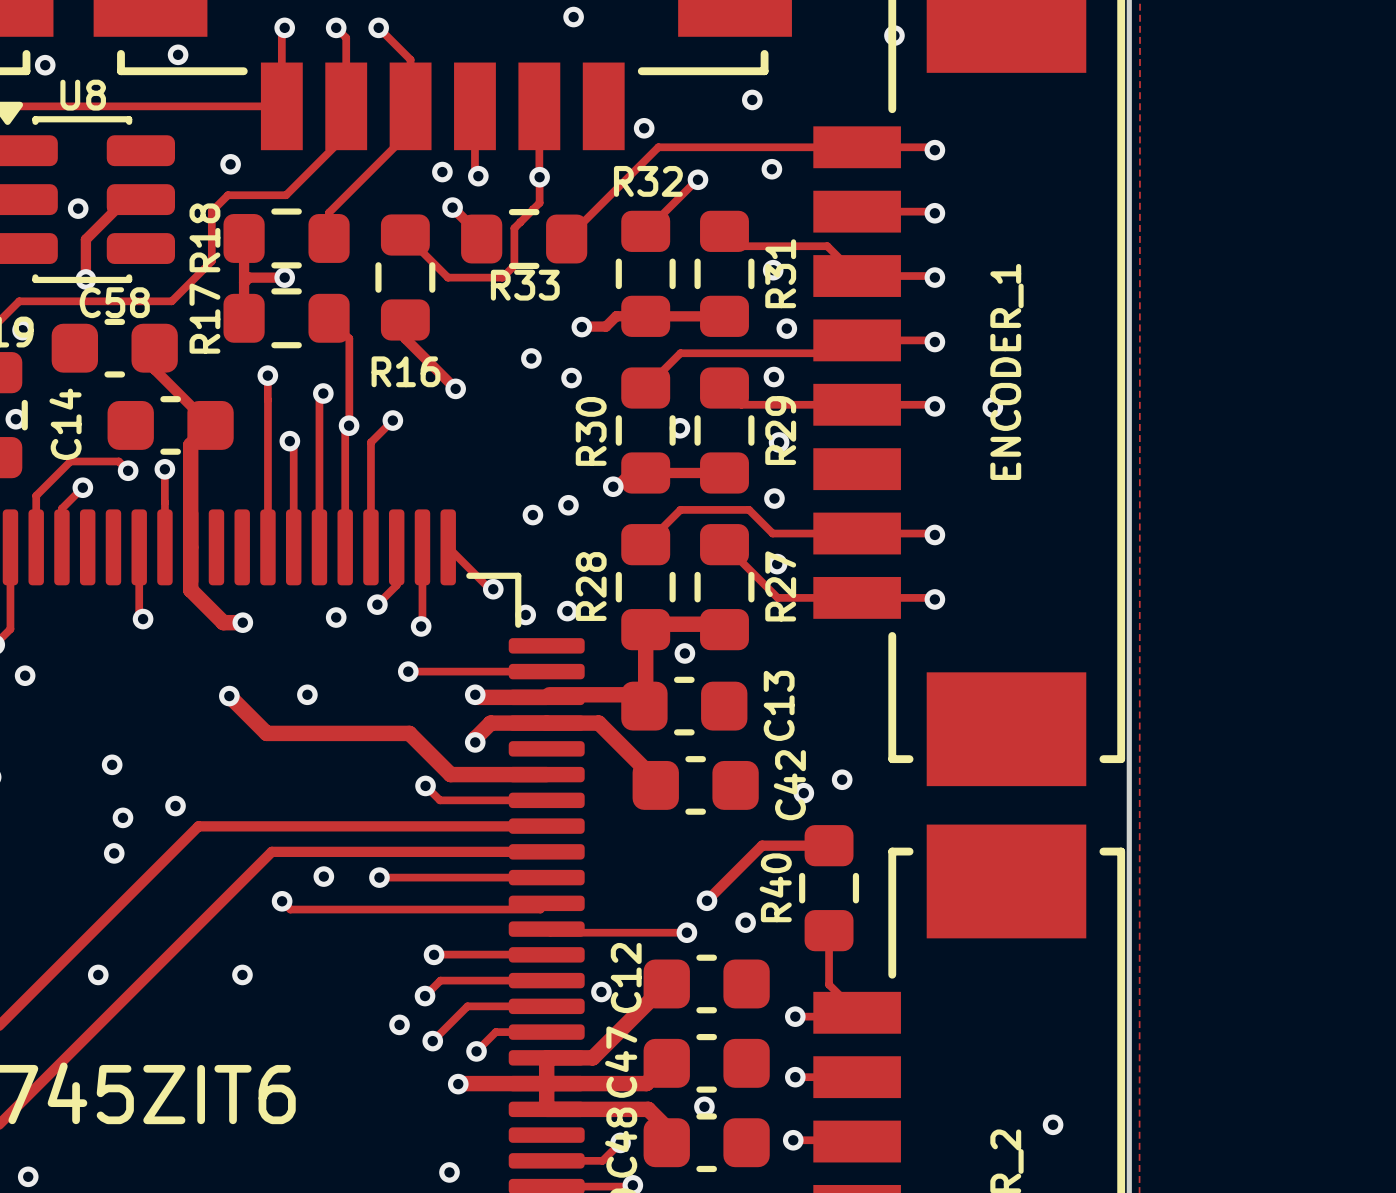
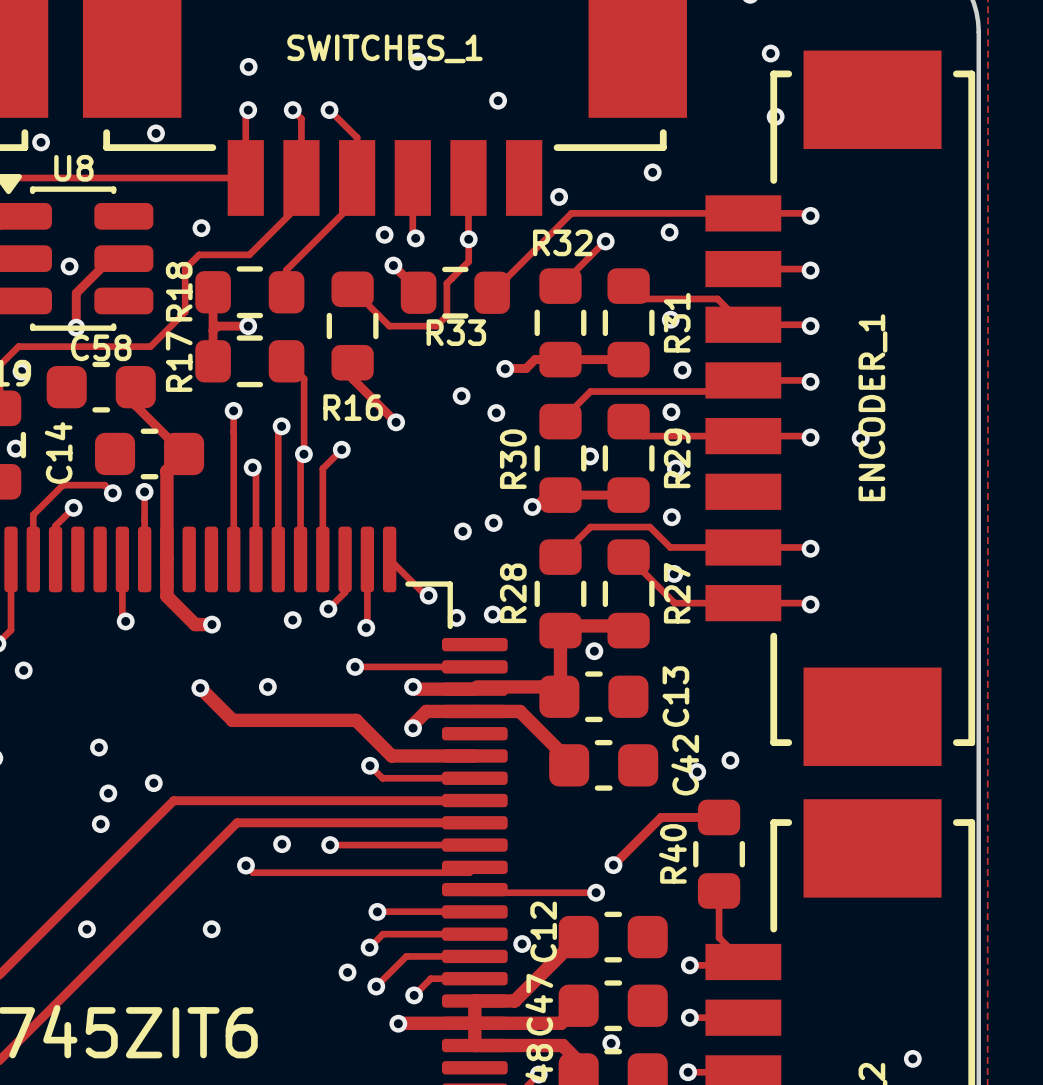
via: (745, 922) -> none

